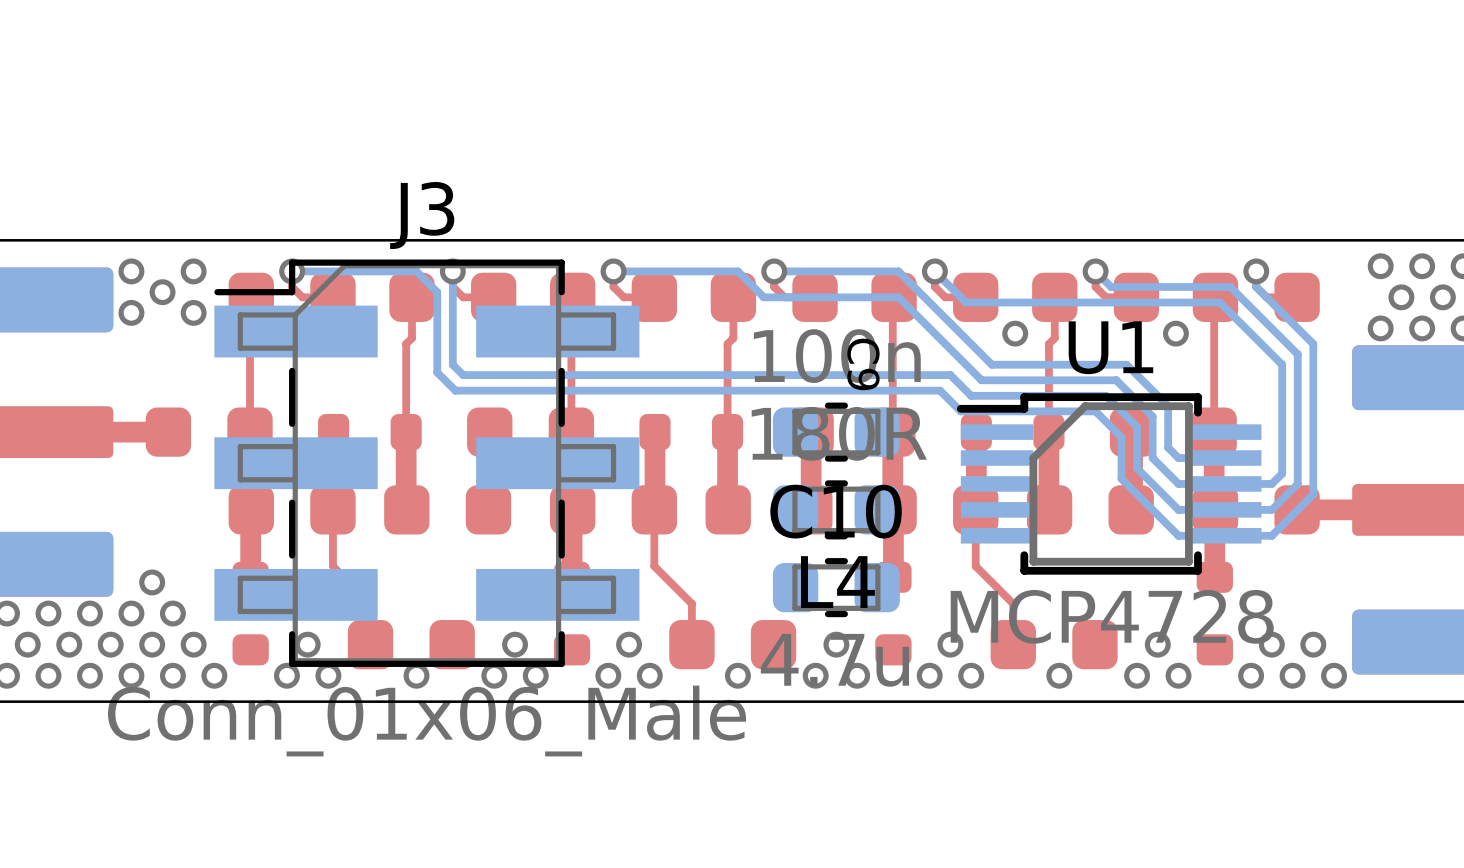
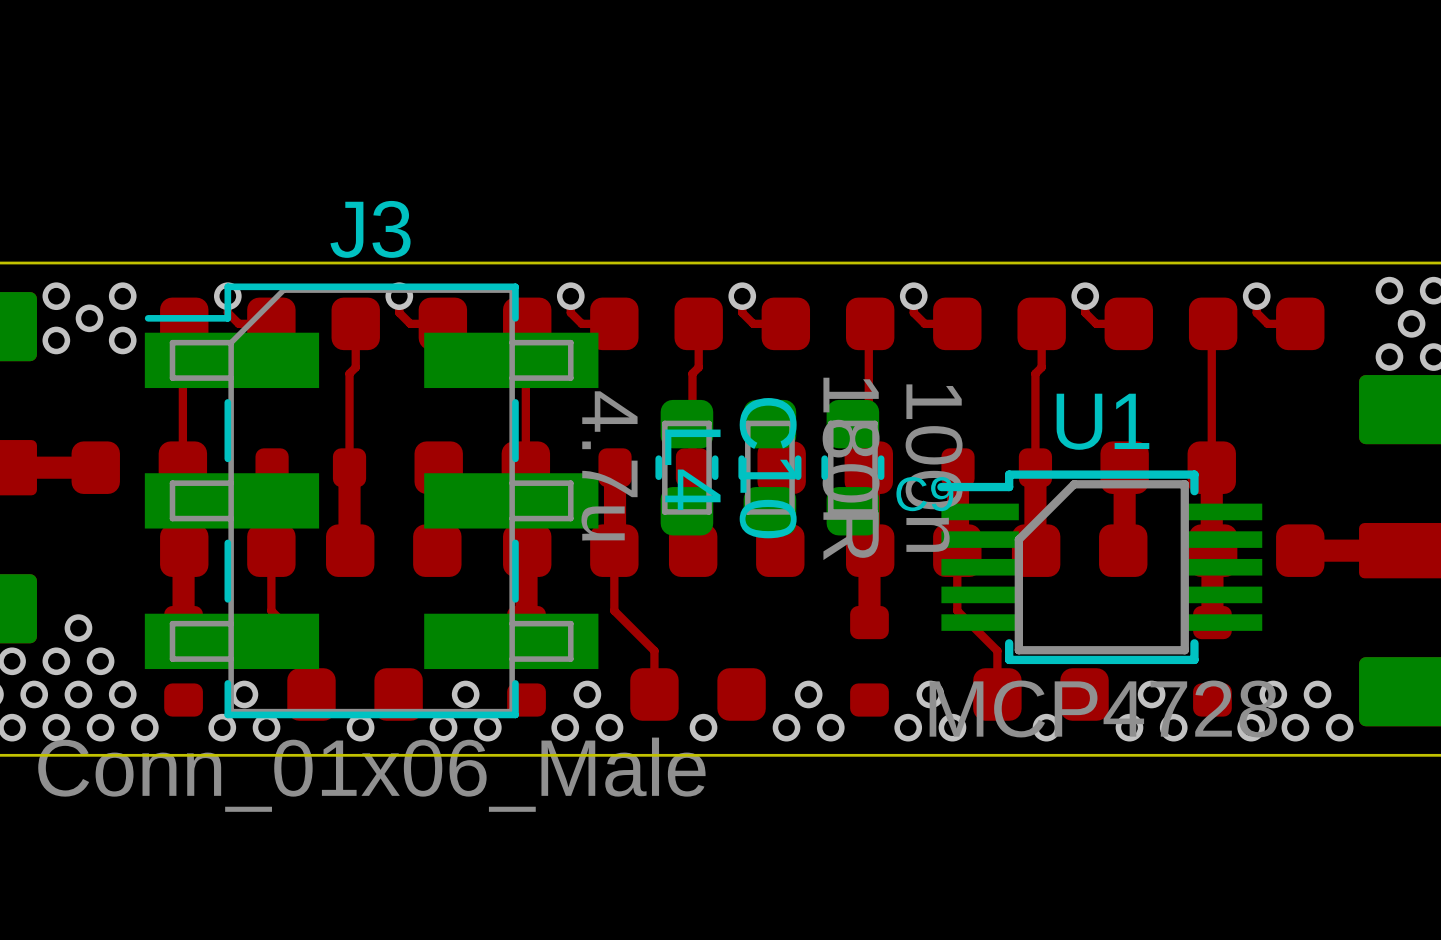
bottom track: (774, 271) (898, 271) (991, 364) (1126, 364) (1168, 406) (1168, 447) (1178, 458) (1225, 458) -> none
bottom track: (934, 271) (966, 302) (1220, 302) (1282, 364) (1282, 473) (1271, 483) (1178, 483) (1152, 458) (1152, 416) (1116, 380) (981, 380) (898, 297) (763, 297) (737, 271) (613, 271) -> none
bottom track: (1095, 271) (1111, 286) (1230, 286) (1297, 354) (1297, 483) (1271, 509) (1178, 509) (1137, 468) (1137, 426) (1105, 395) (971, 395) (950, 375) (463, 375) (452, 364) (452, 271) -> none
bottom track: (1256, 271) (1256, 286) (1313, 343) (1313, 494) (1271, 535) (1178, 535) (1121, 478) (1121, 437) (1095, 411) (960, 411) (940, 390) (455, 390) (437, 372) (437, 292) (416, 271) (292, 271) -> none
via: (1015, 333) -> none
via: (1175, 333) -> none
C9 rotation: 0° (836, 432) -> 90° clockwise (852, 467)
U1 position: (1109, 483) -> (1099, 567)
L4 rotation: 0° (836, 509) -> 90° clockwise (769, 467)
L4 position: (836, 509) -> (769, 467)
C10 rotation: 0° (836, 587) -> 90° clockwise (686, 467)
C10 position: (836, 587) -> (686, 467)

